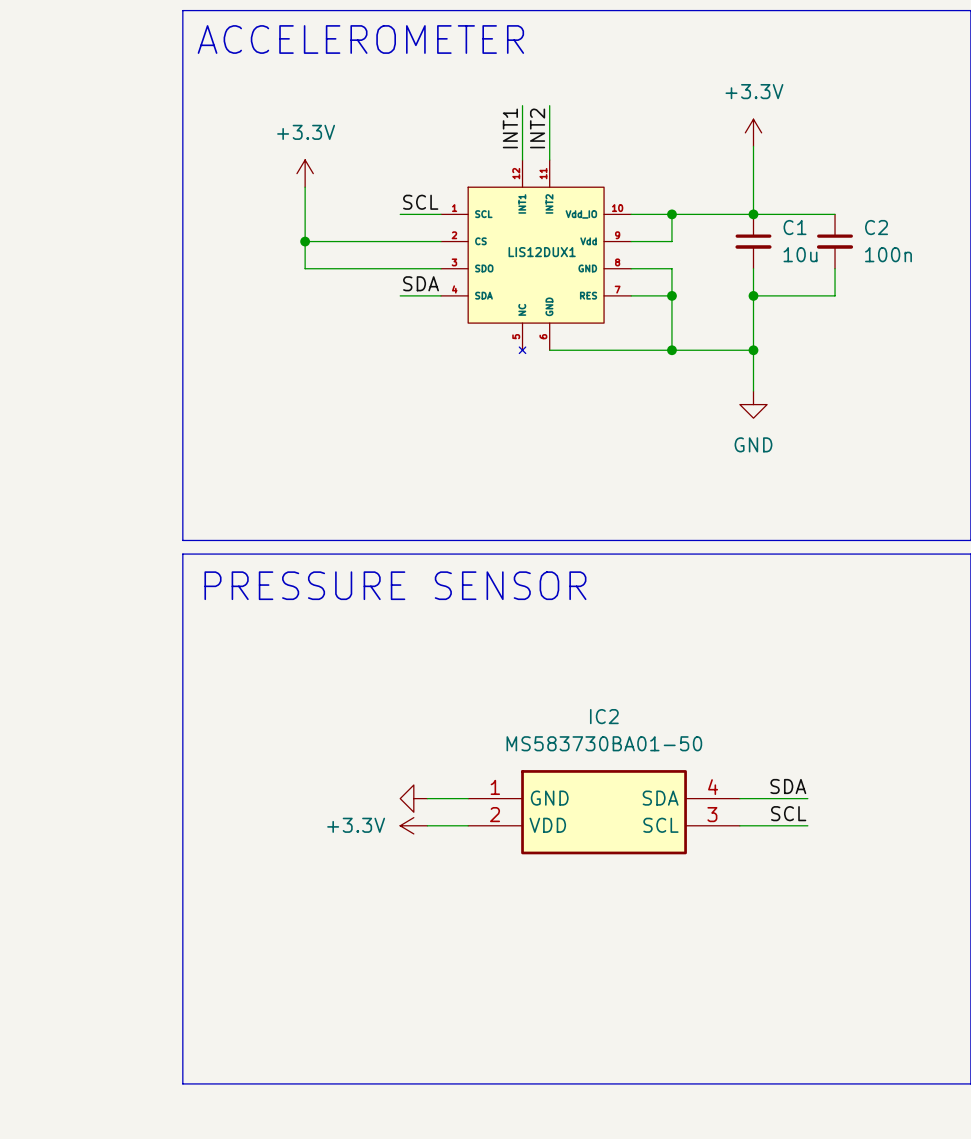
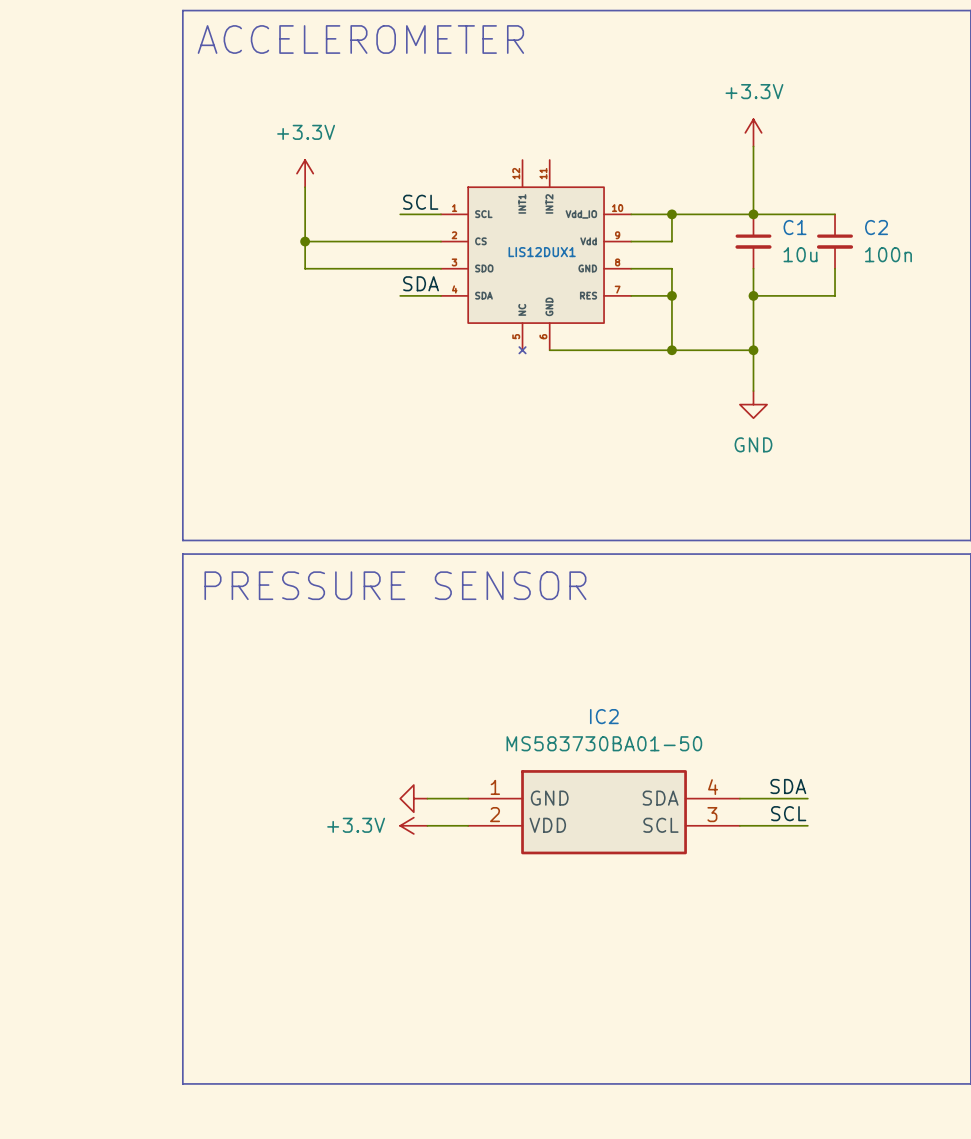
wire: (522, 105) (522, 160) -> none
wire: (549, 105) (549, 160) -> none
label: INT1 (510, 128) -> none
label: INT2 (537, 128) -> none

